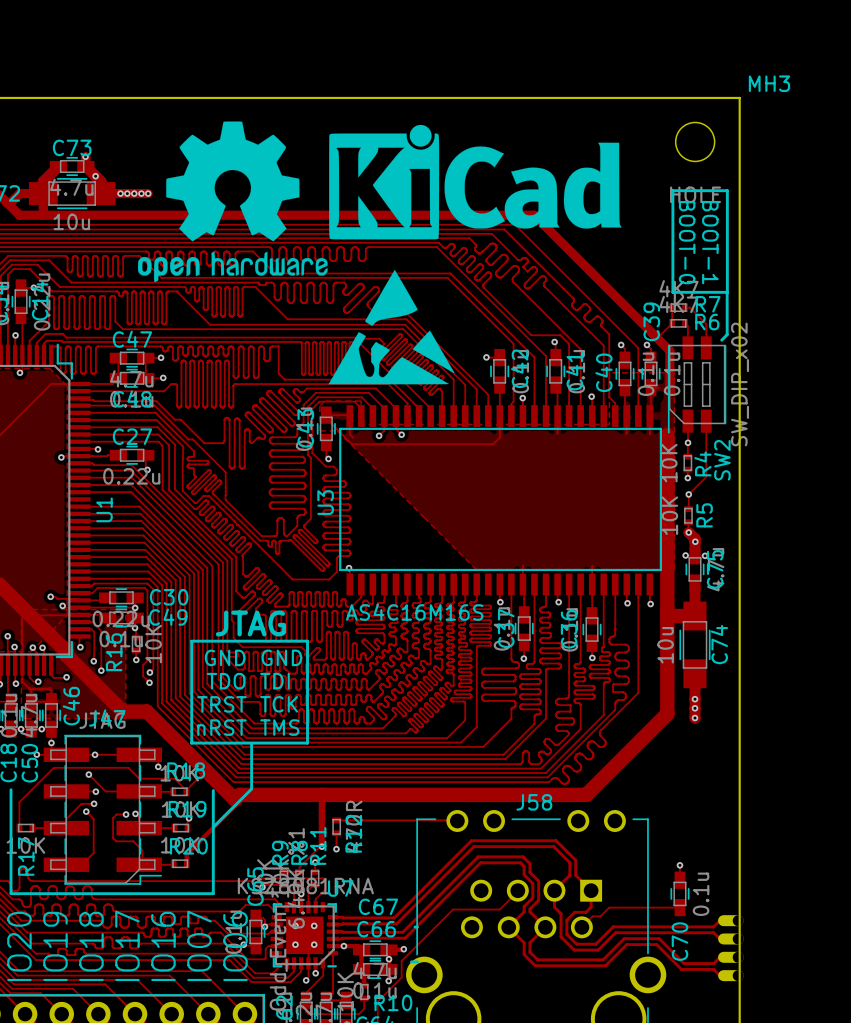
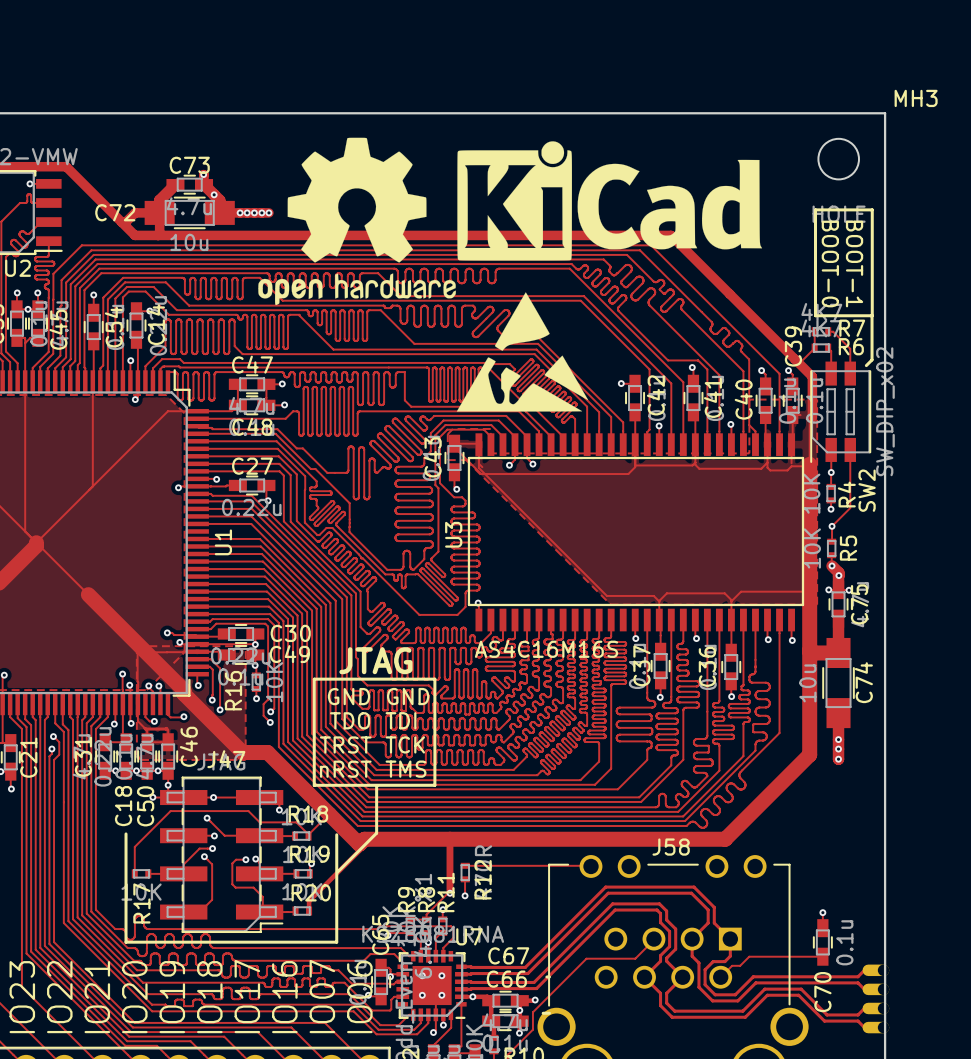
track: none -> (812, 417) (809, 420) (809, 464) (807, 466) (791, 466) (787, 470) (770, 470) (767, 467) (767, 462)
track: none -> (695, 462) (699, 468) (761, 468) (766, 463)
track: none -> (694, 462) (692, 465) (635, 465)
track: none -> (478, 463) (478, 467) (606, 595) (653, 595) (659, 600)
track: none -> (809, 591) (741, 591) (732, 600)
track: none -> (659, 600) (666, 593) (724, 593) (731, 601)

